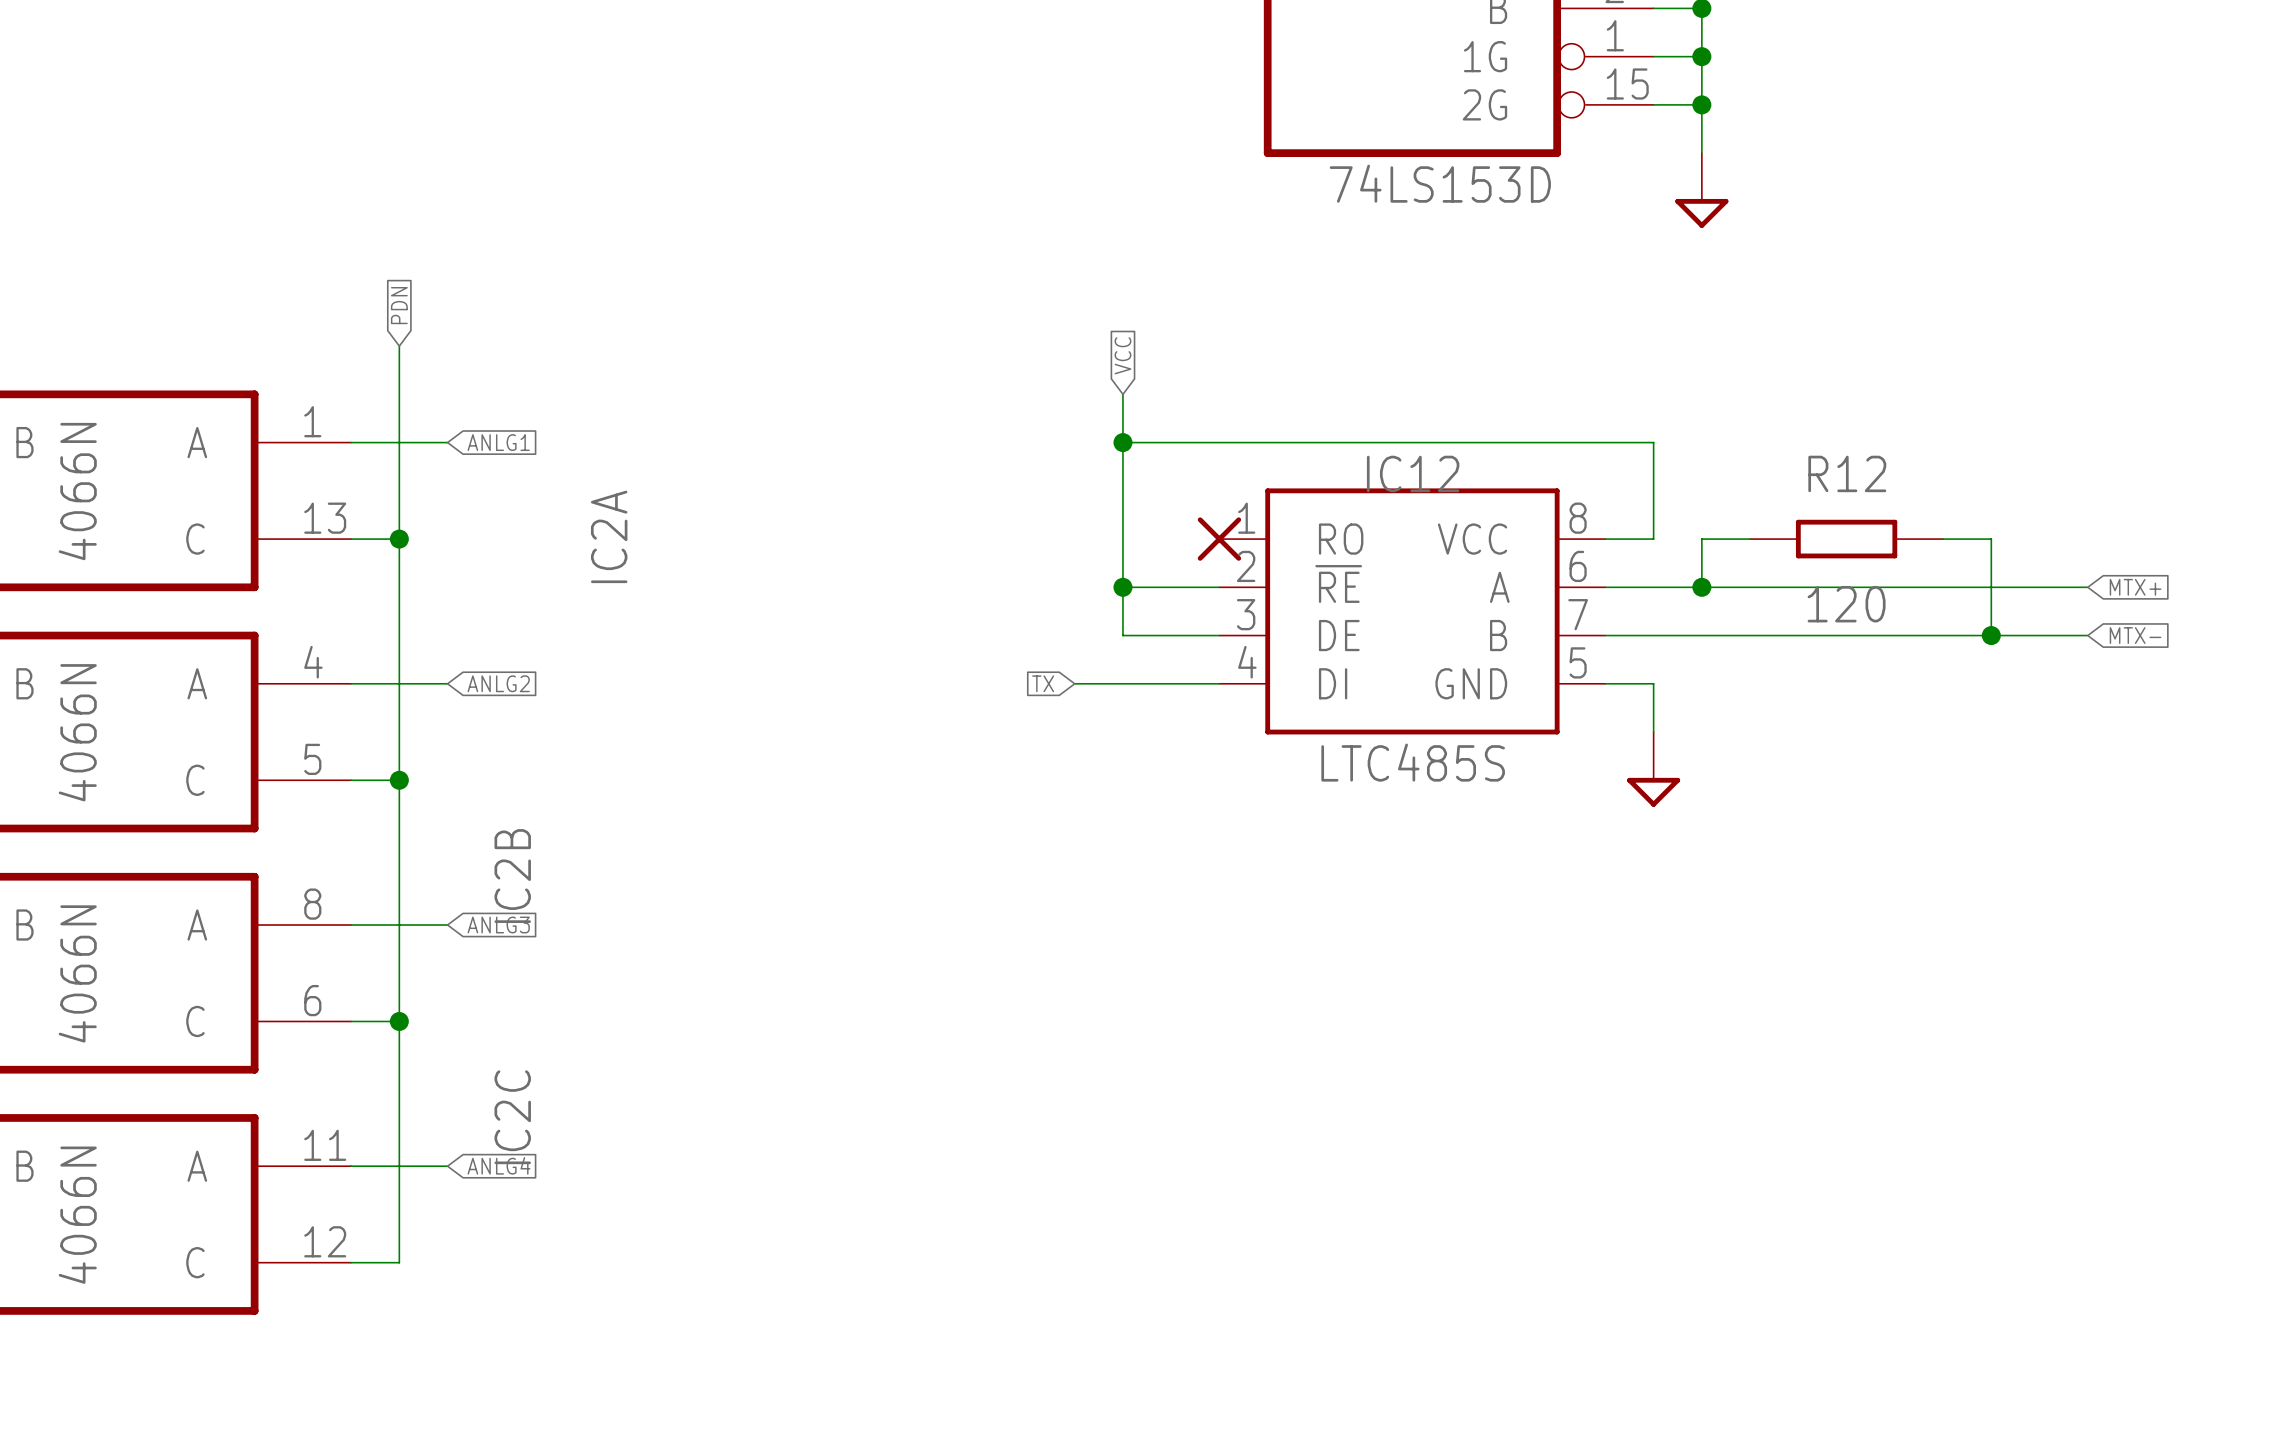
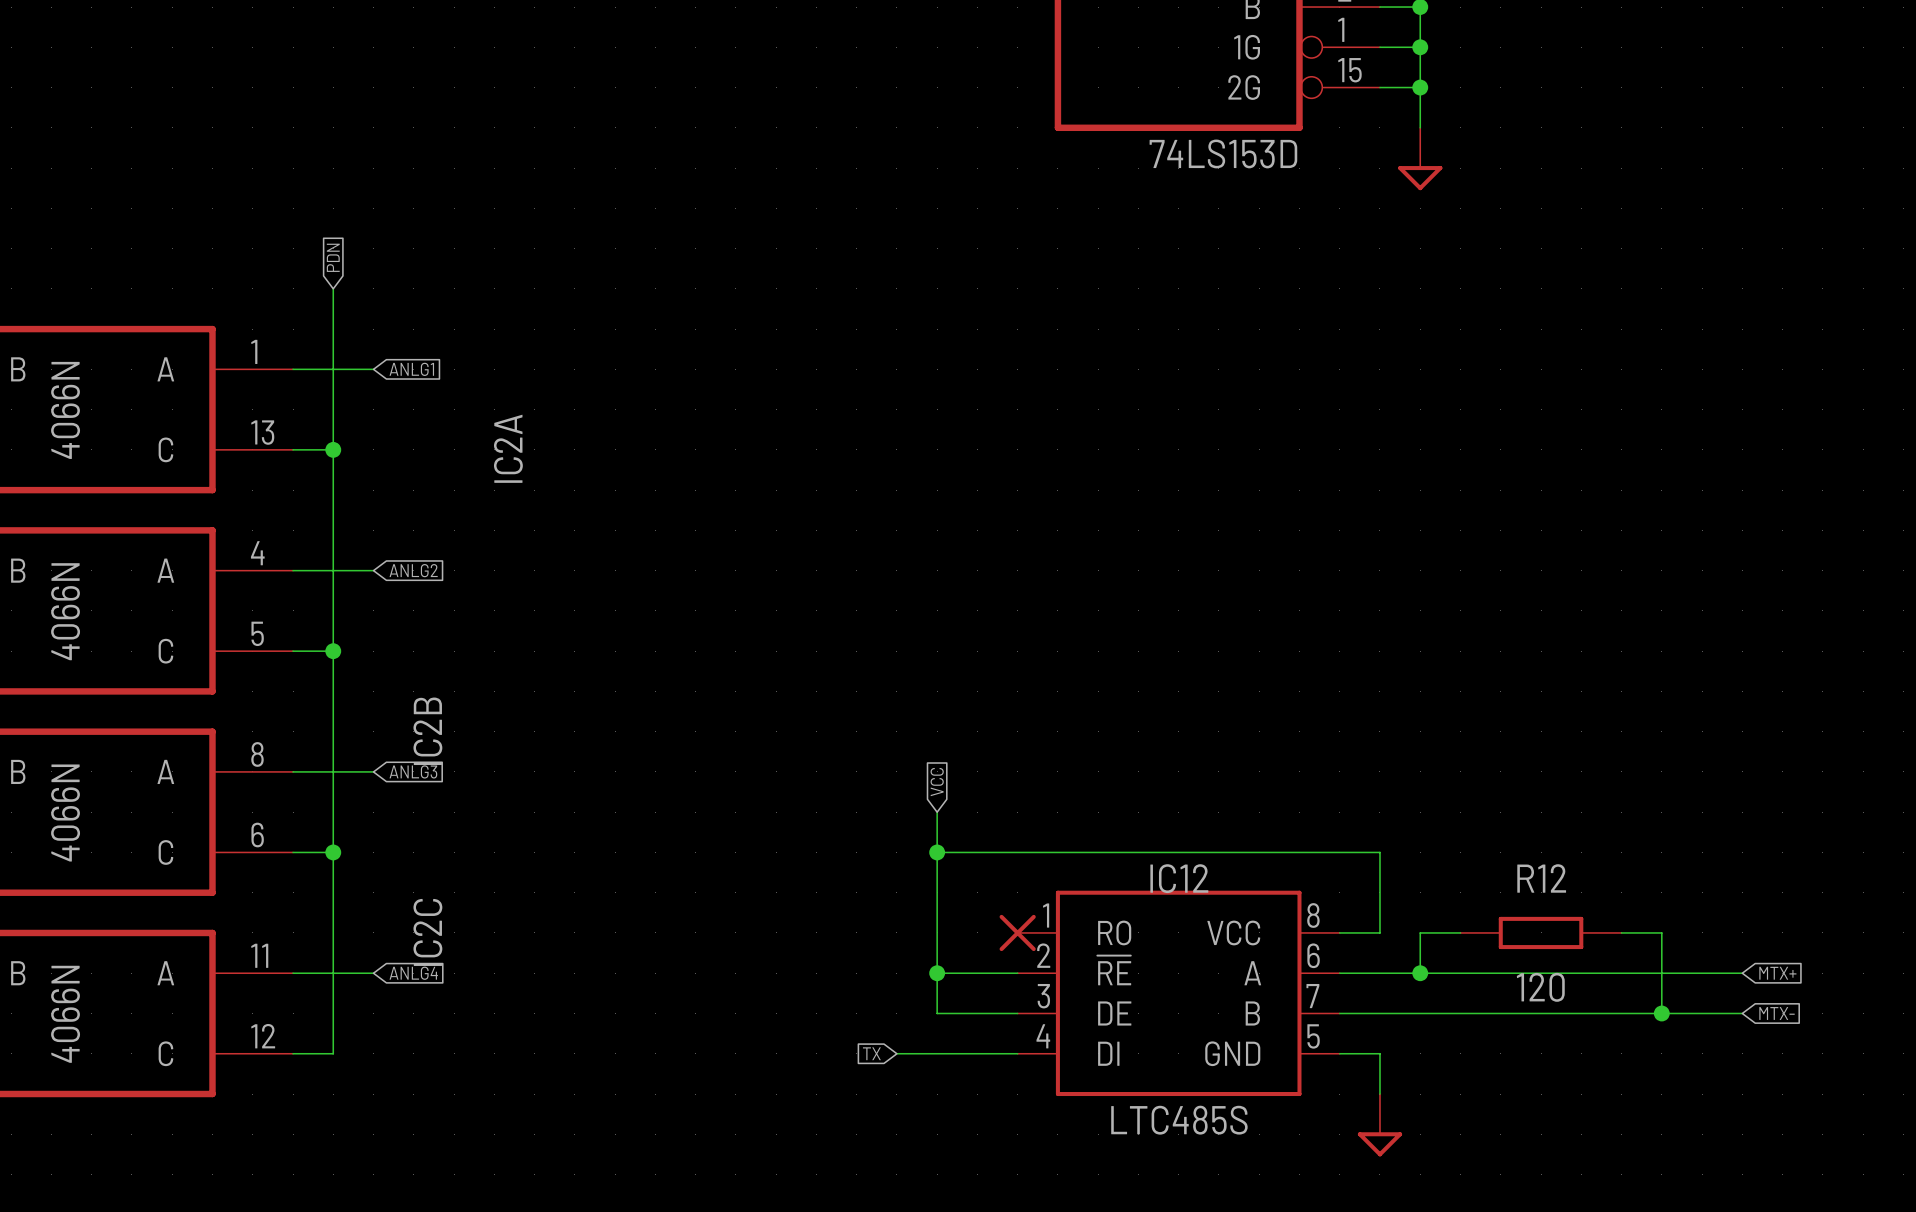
global label: VCC (1122, 355) -> none
wire: (1122, 394) (1122, 635) (1219, 635) -> none
wire: (1122, 442) (1653, 442) (1653, 539) (1605, 539) -> none
junction: (1122, 442) -> none
part: (1219, 539) -> none
wire: (1750, 539) (1701, 539) (1701, 587) -> none
R12 position: (1846, 539) -> (1541, 932)
wire: (1943, 539) (1991, 539) (1991, 635) -> none
wire: (1122, 587) (1219, 587) -> none
junction: (1122, 587) -> none
wire: (1605, 587) (2087, 587) -> none
junction: (1701, 587) -> none
global label: MTX+ (2135, 587) -> none
IC12 position: (1412, 611) -> (1178, 993)
wire: (1605, 635) (2087, 635) -> none
junction: (1991, 635) -> none
global label: MTX- (2135, 635) -> none
global label: TX (1043, 683) -> none
wire: (1074, 683) (1219, 683) -> none
wire: (1605, 683) (1653, 683) (1653, 732) -> none
power symbol: (1653, 769) -> none
global label: none -> VCC (937, 782)
wire: none -> (937, 812) (937, 1013) (1017, 1013)
wire: none -> (937, 852) (1379, 852) (1379, 932) (1339, 932)
junction: none -> (937, 852)
part: none -> (1017, 932)
wire: none -> (1460, 932) (1420, 932) (1420, 973)
wire: none -> (1621, 932) (1661, 932) (1661, 1013)
wire: none -> (937, 973) (1017, 973)
junction: none -> (937, 973)
wire: none -> (1339, 973) (1742, 973)
junction: none -> (1420, 973)
global label: none -> MTX+ (1777, 973)
wire: none -> (1339, 1013) (1742, 1013)
junction: none -> (1661, 1013)
global label: none -> MTX- (1777, 1013)
global label: none -> TX (871, 1053)
wire: none -> (896, 1053) (1017, 1053)
wire: none -> (1339, 1053) (1379, 1053) (1379, 1094)
power symbol: none -> (1379, 1125)

